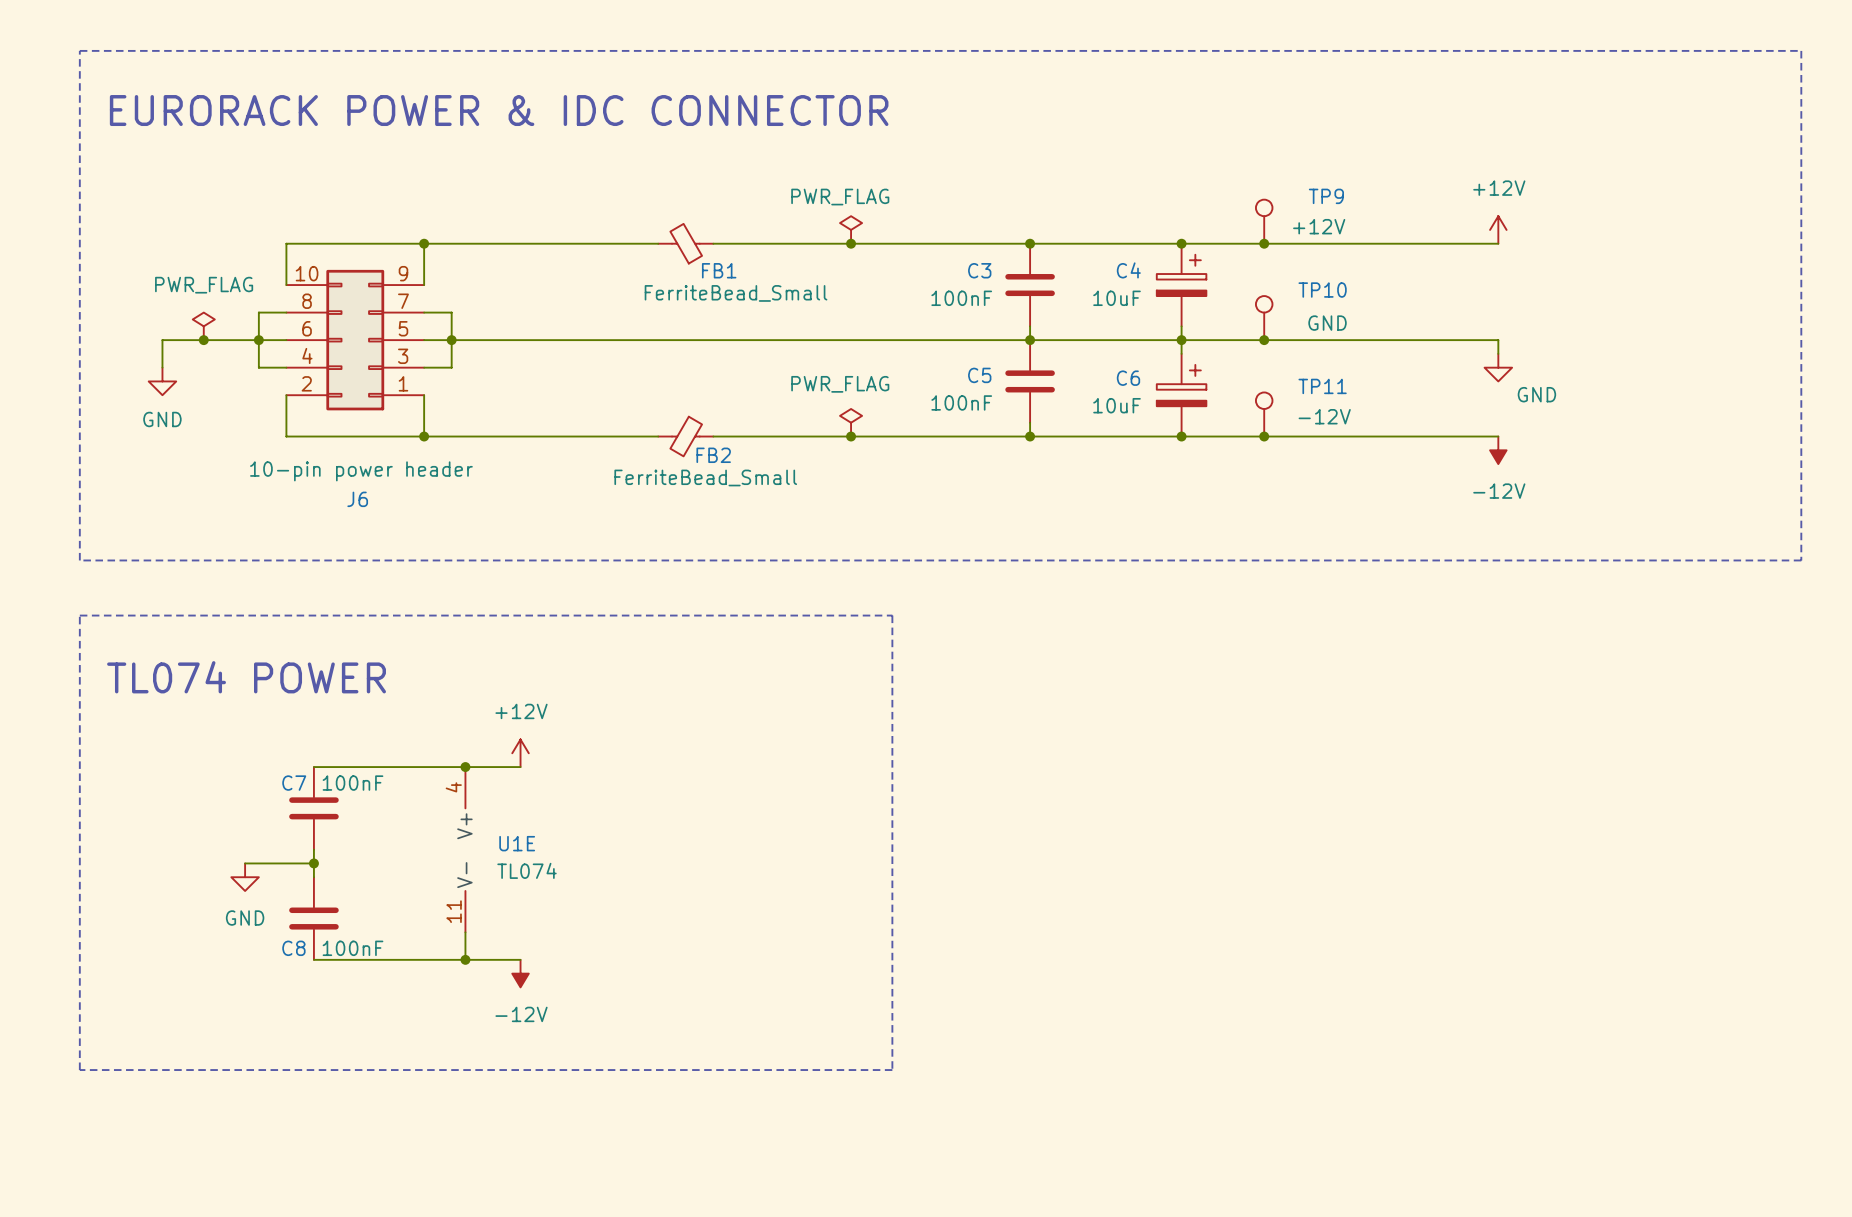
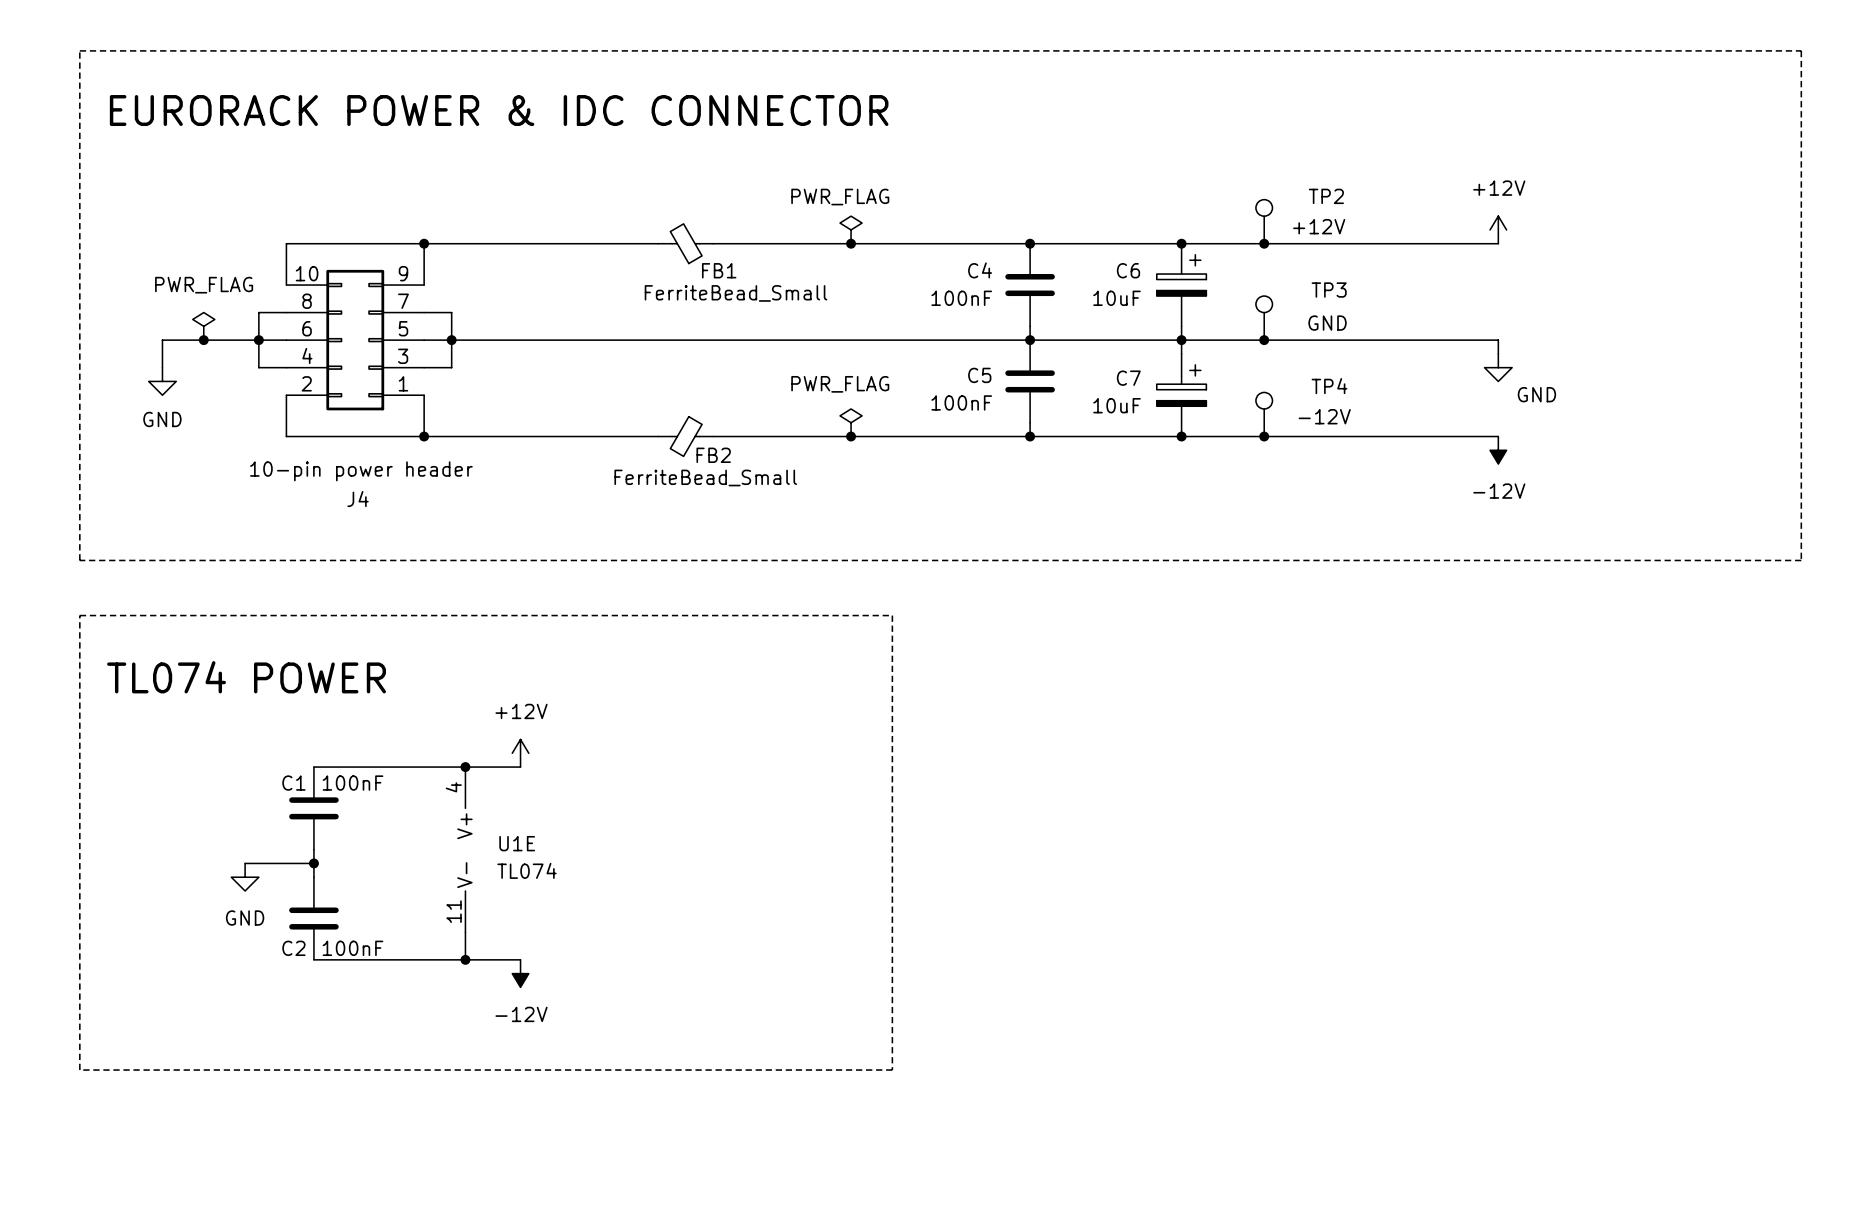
TP9 name: TP9 (1326, 196) -> TP2 (1326, 196)
C3 name: C3 (979, 270) -> C4 (980, 270)
C4 name: C4 (1128, 270) -> C6 (1128, 270)
TP10 name: TP10 (1322, 290) -> TP3 (1329, 290)
C6 name: C6 (1128, 378) -> C7 (1128, 378)
TP11 name: TP11 (1322, 386) -> TP4 (1329, 386)
J6 name: J6 (357, 499) -> J4 (358, 499)
C7 name: C7 (294, 783) -> C1 (293, 783)
C8 name: C8 (293, 948) -> C2 (293, 948)

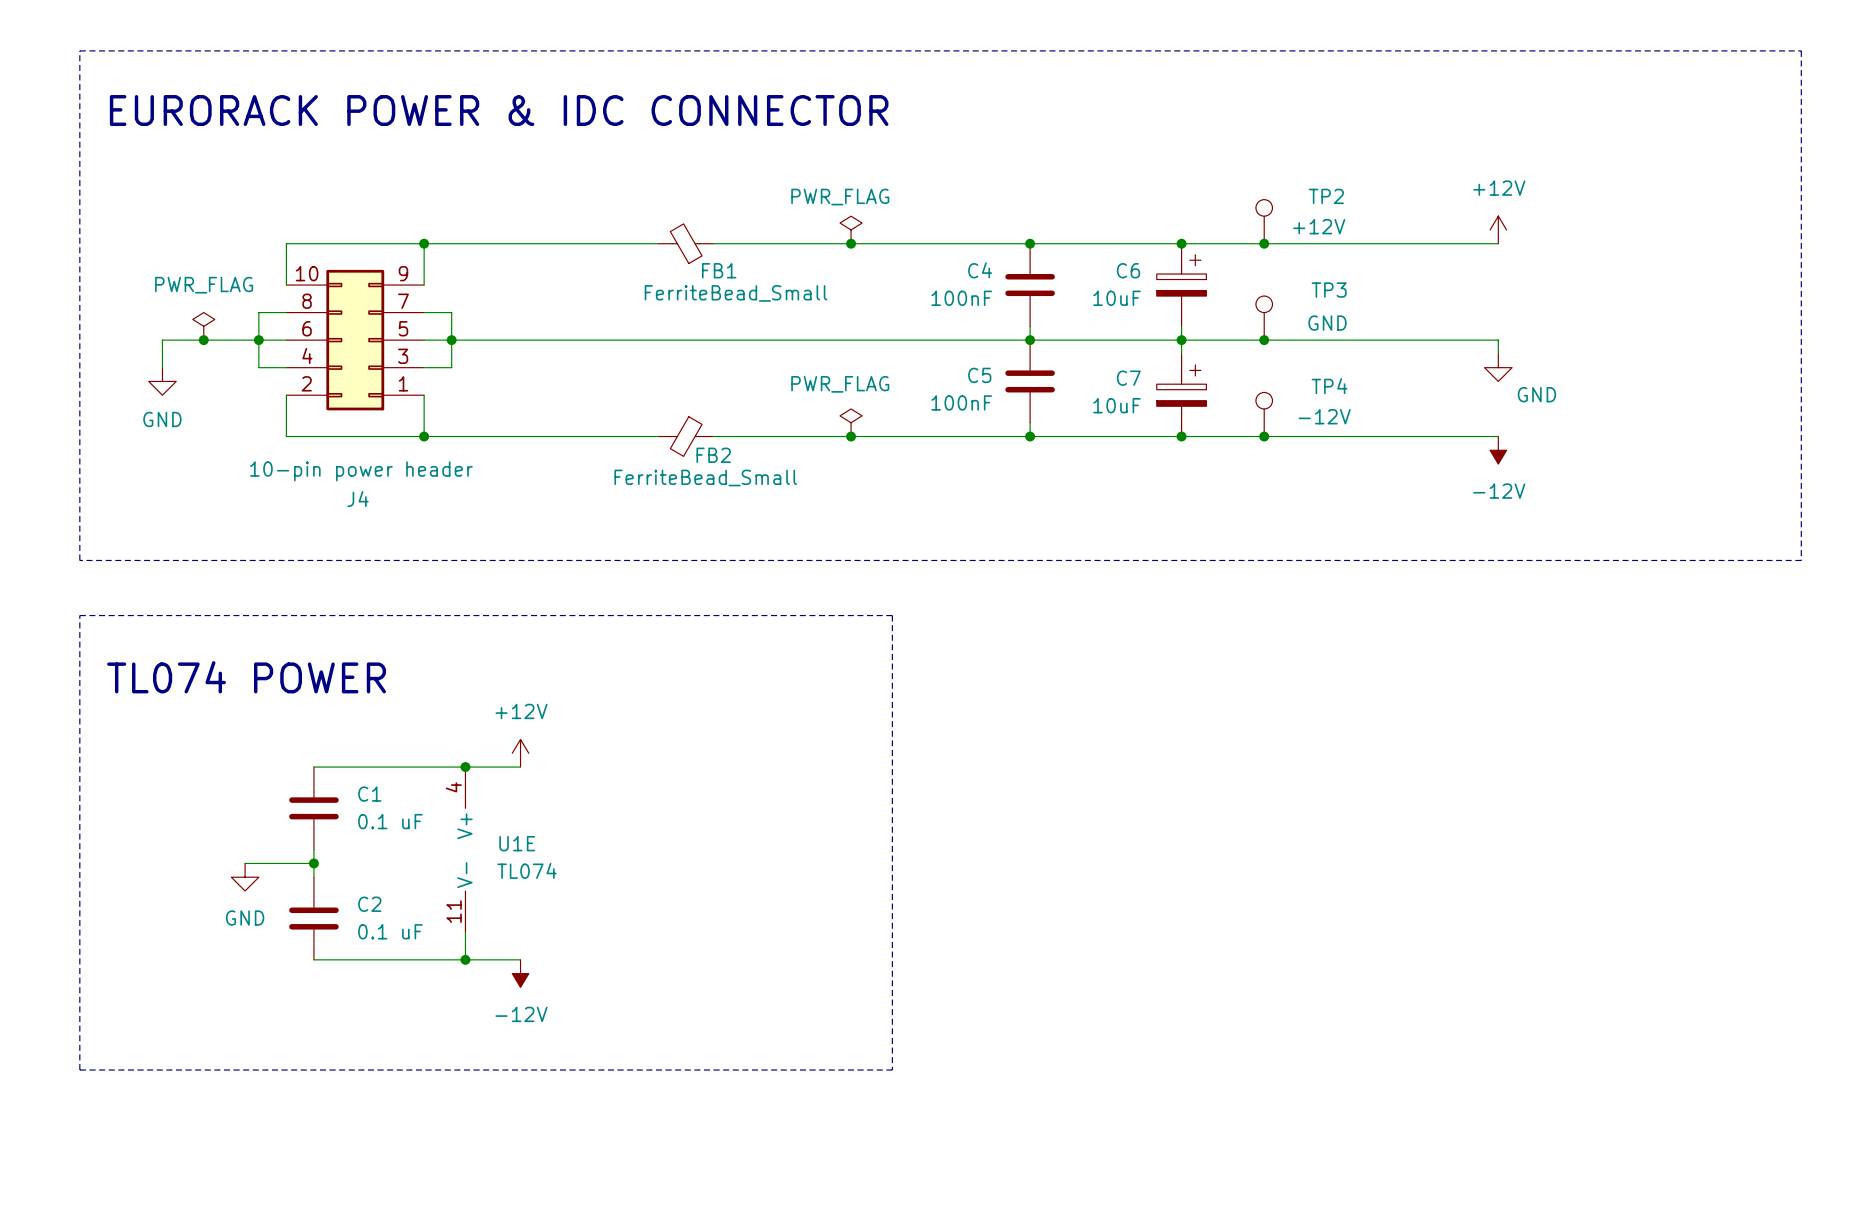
C1 name position: C1 (293, 783) -> C1 (369, 794)
C1 value: 100nF (353, 783) -> 0.1 uF (390, 821)
C2 name position: C2 (293, 948) -> C2 (369, 904)
C2 value: 100nF (353, 948) -> 0.1 uF (390, 931)

